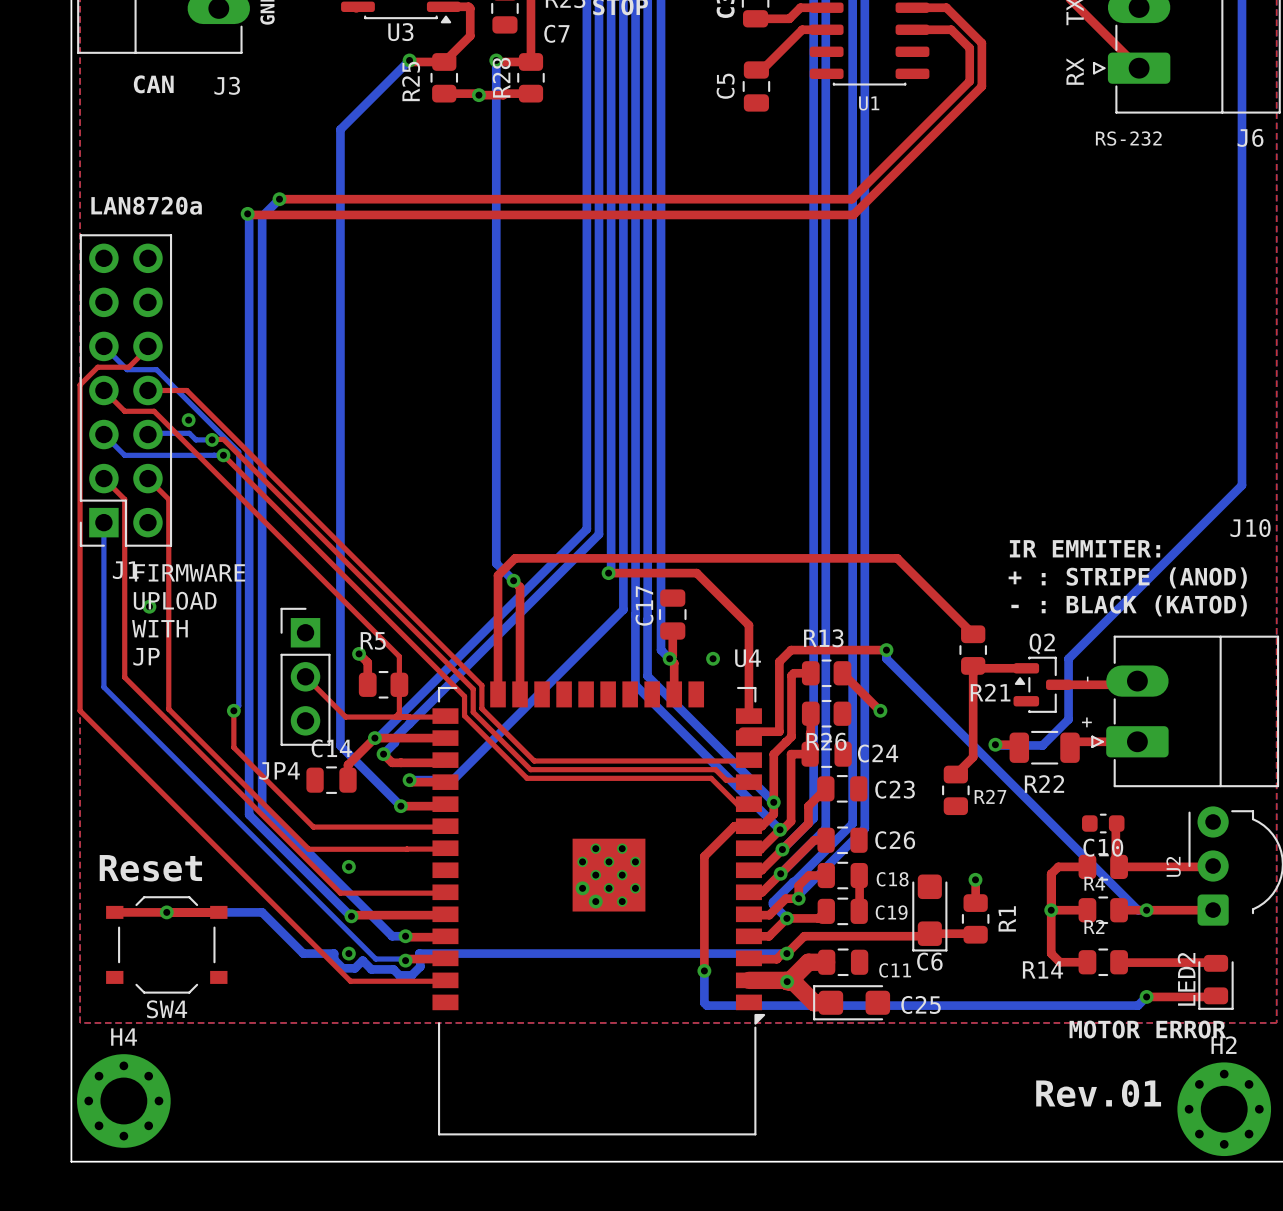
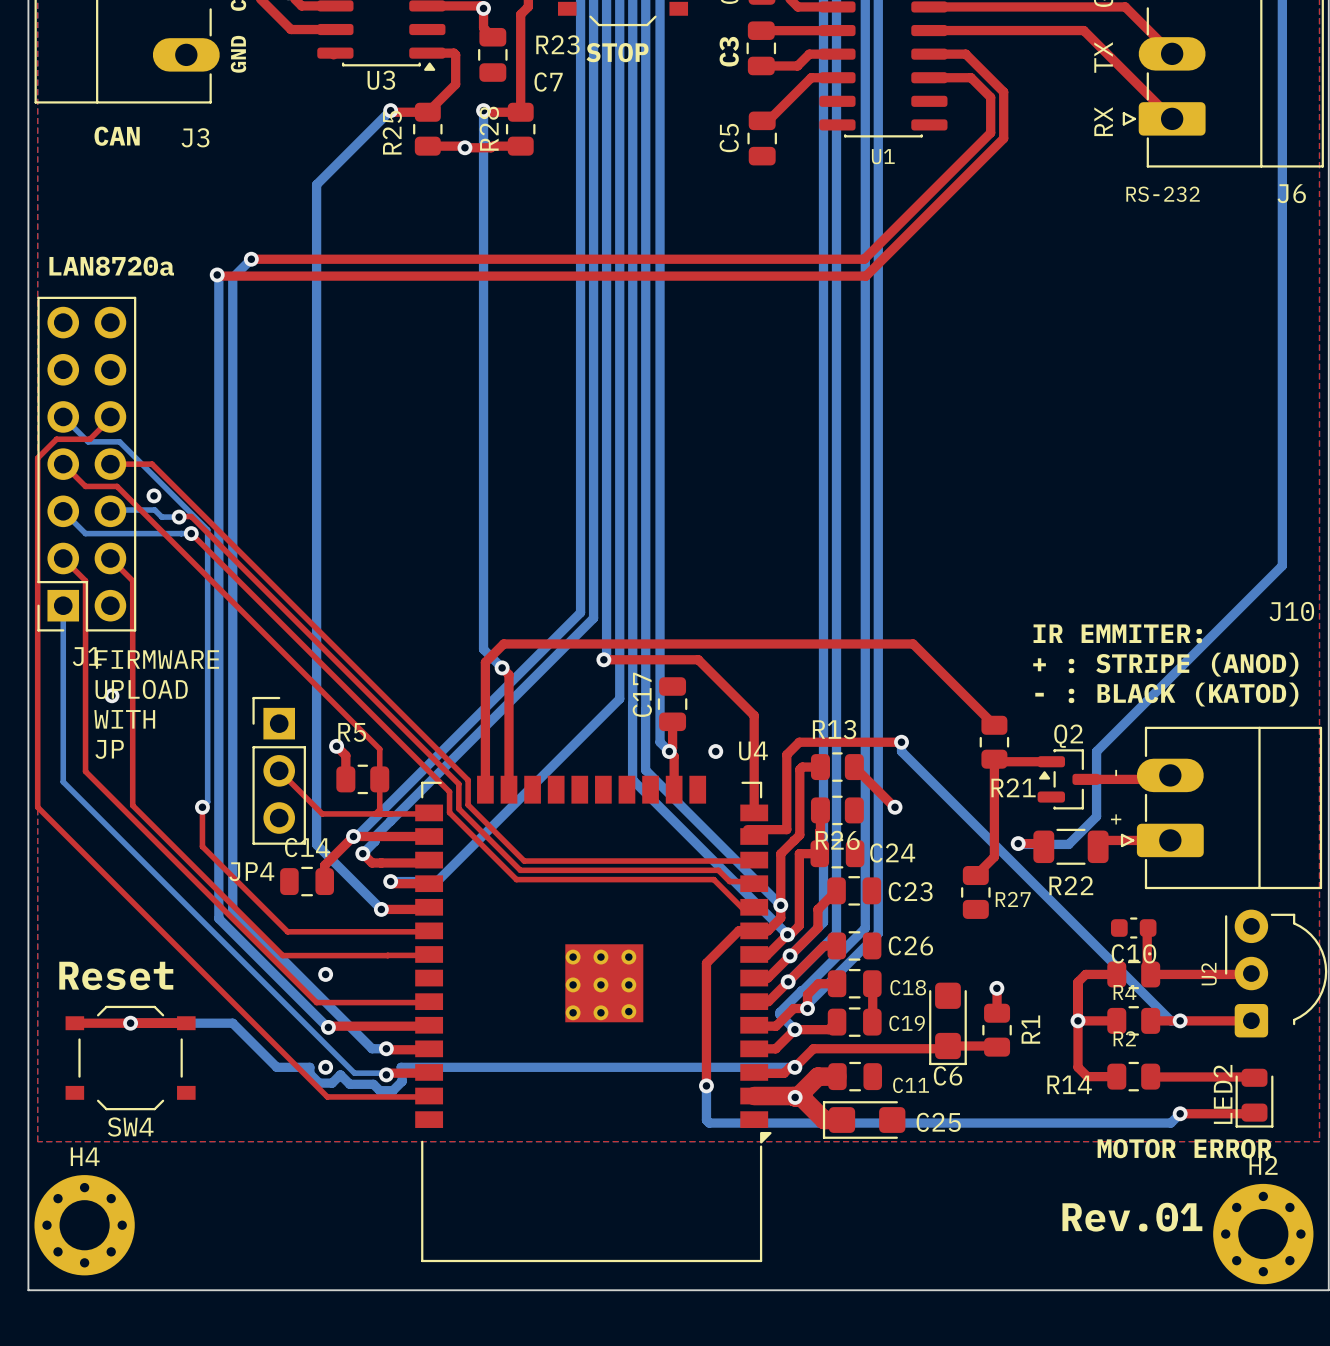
U4 footprint: [432, 681, 766, 1136] -> [415, 775, 772, 1263]

